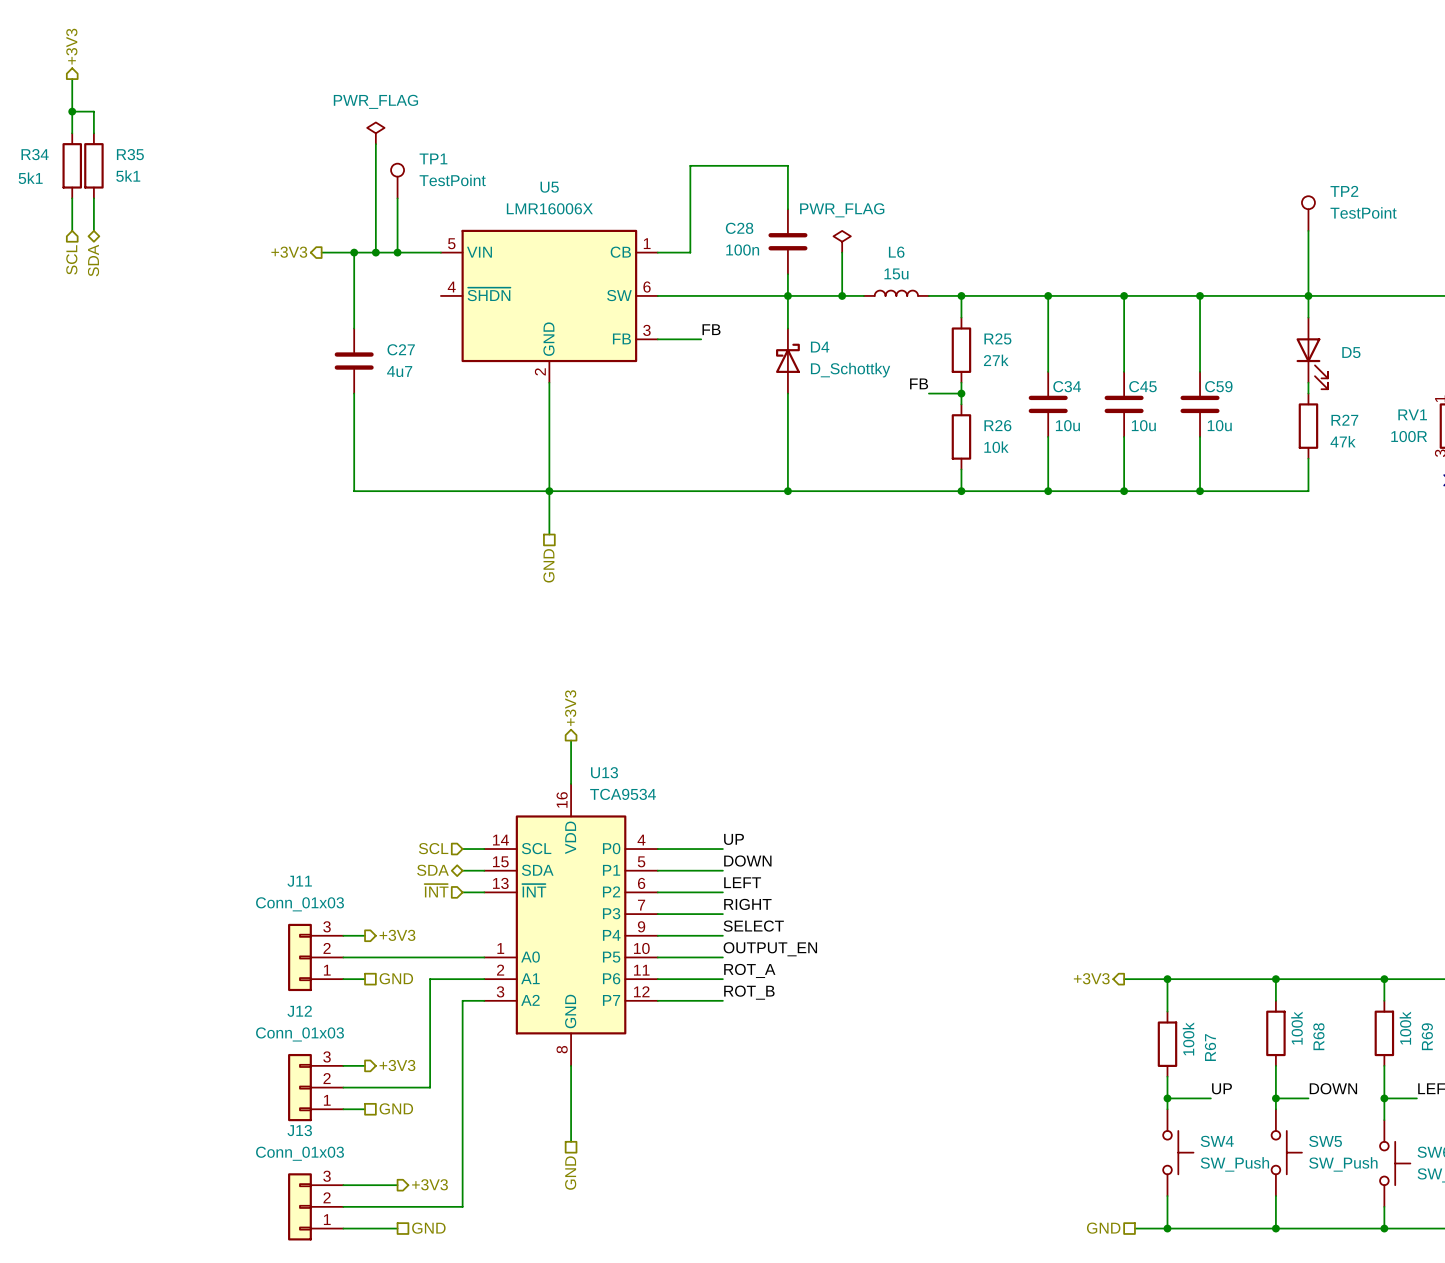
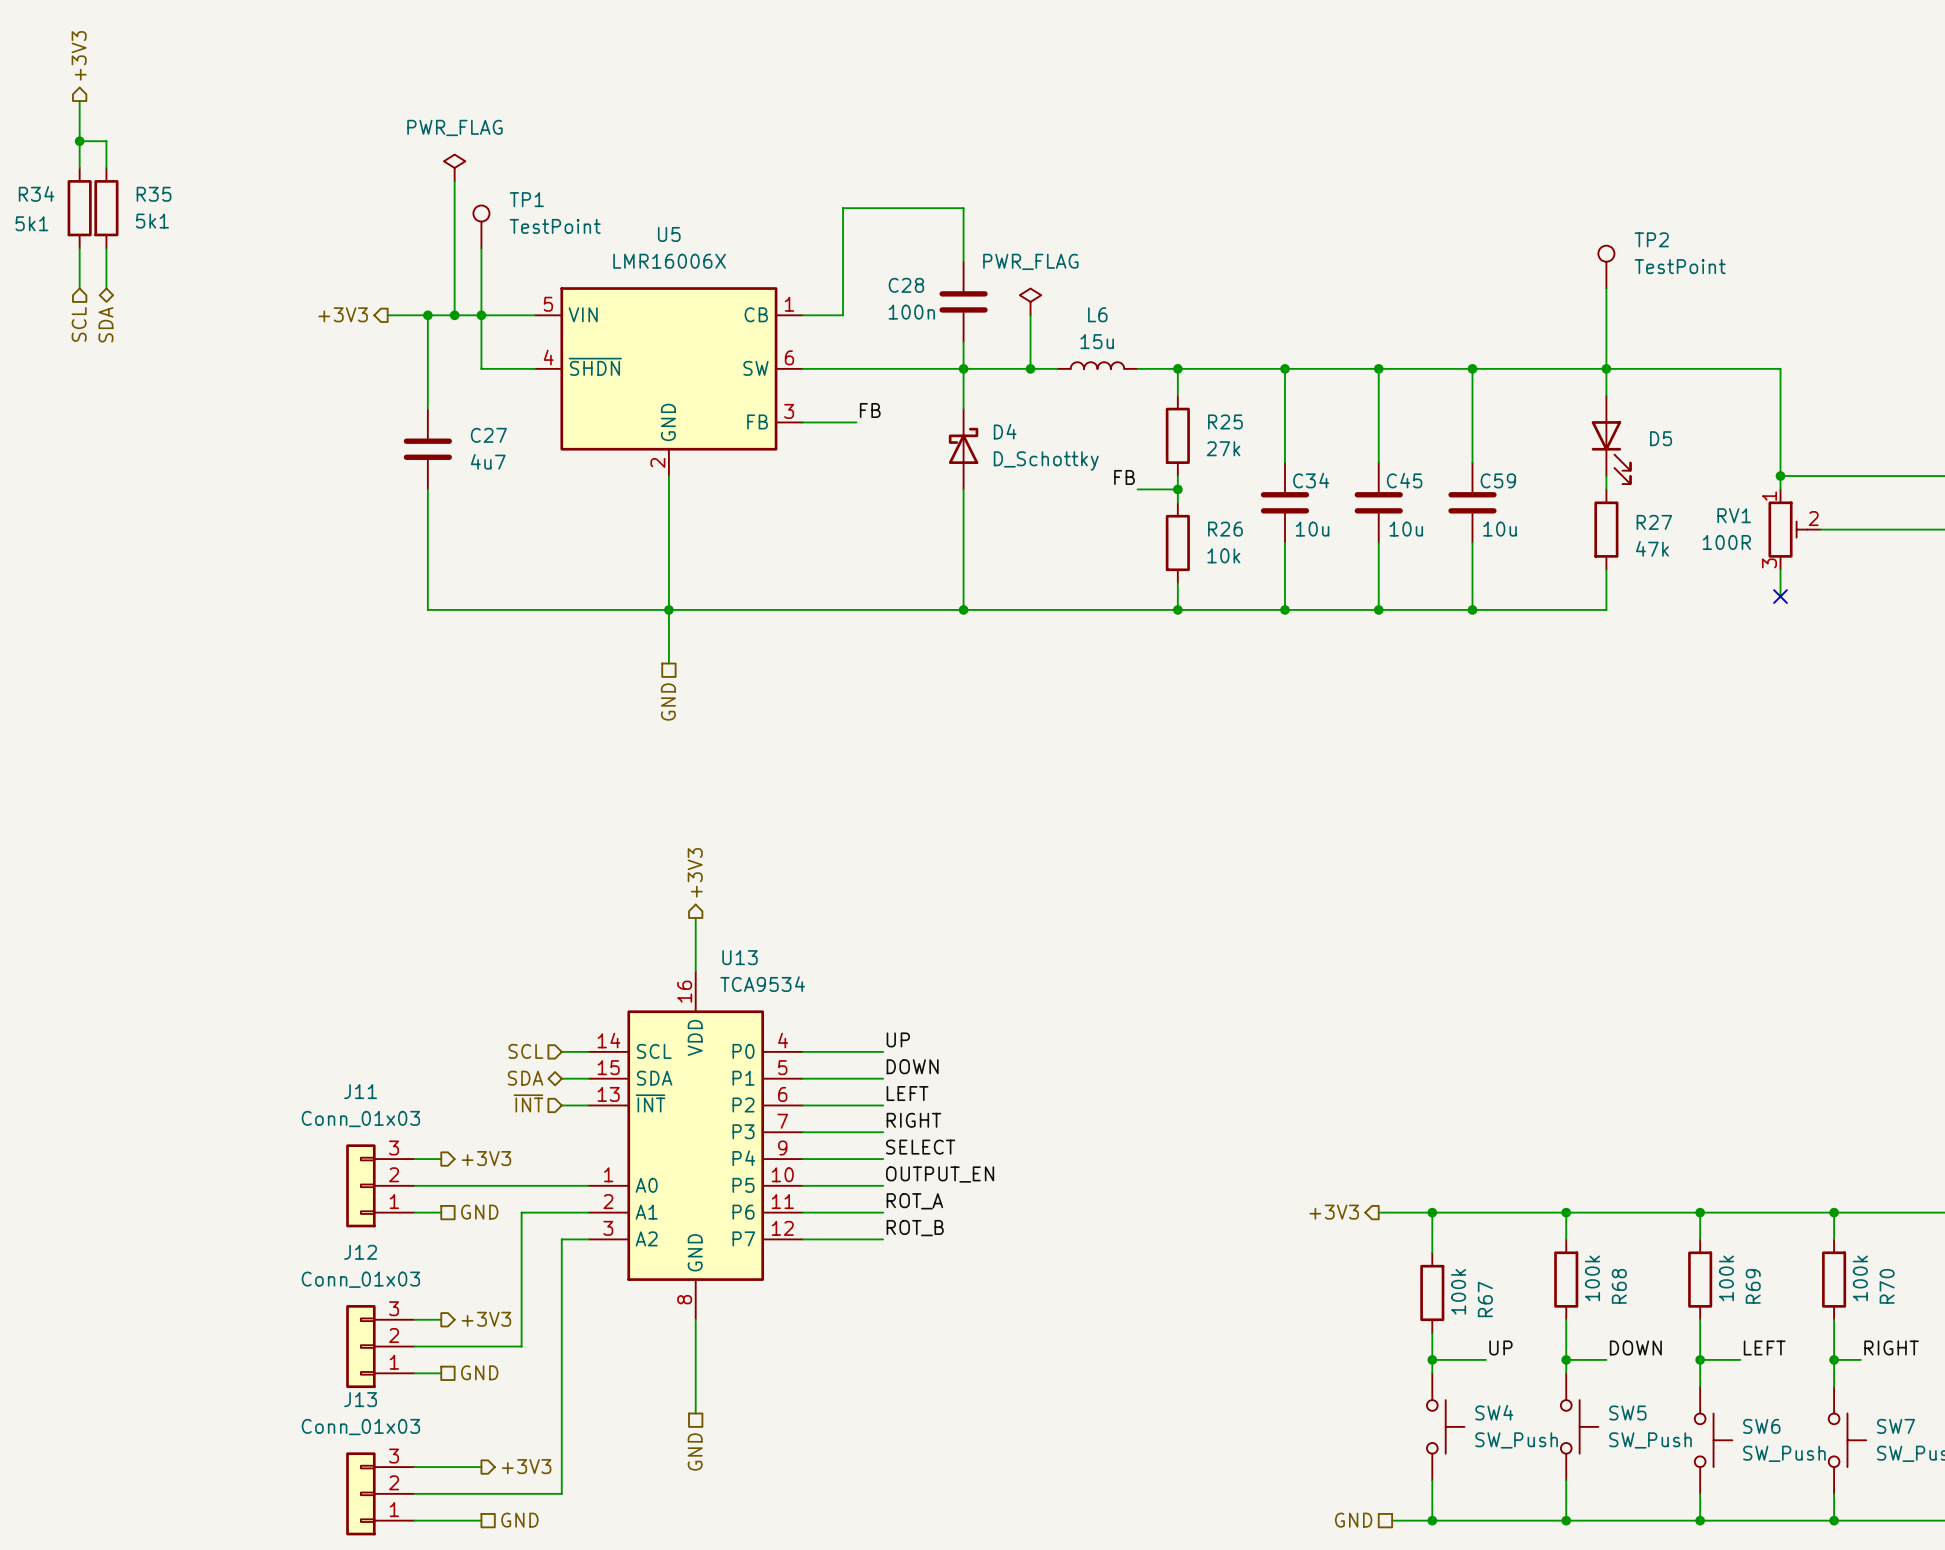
wire: none -> (481, 315) (481, 368) (535, 368)

